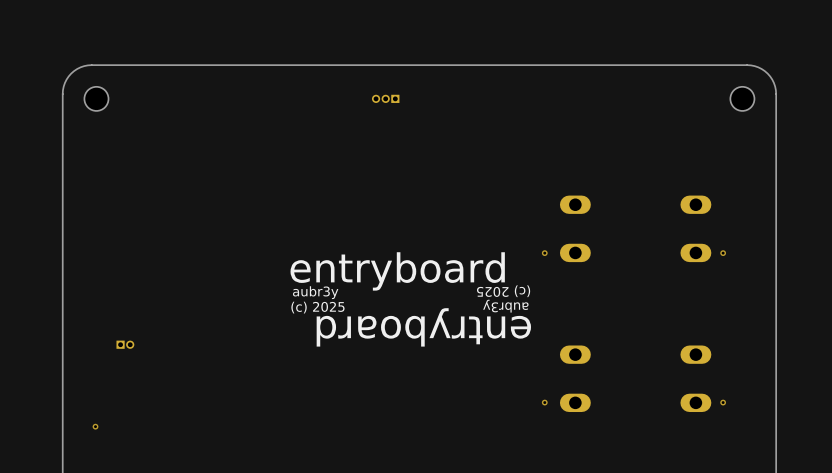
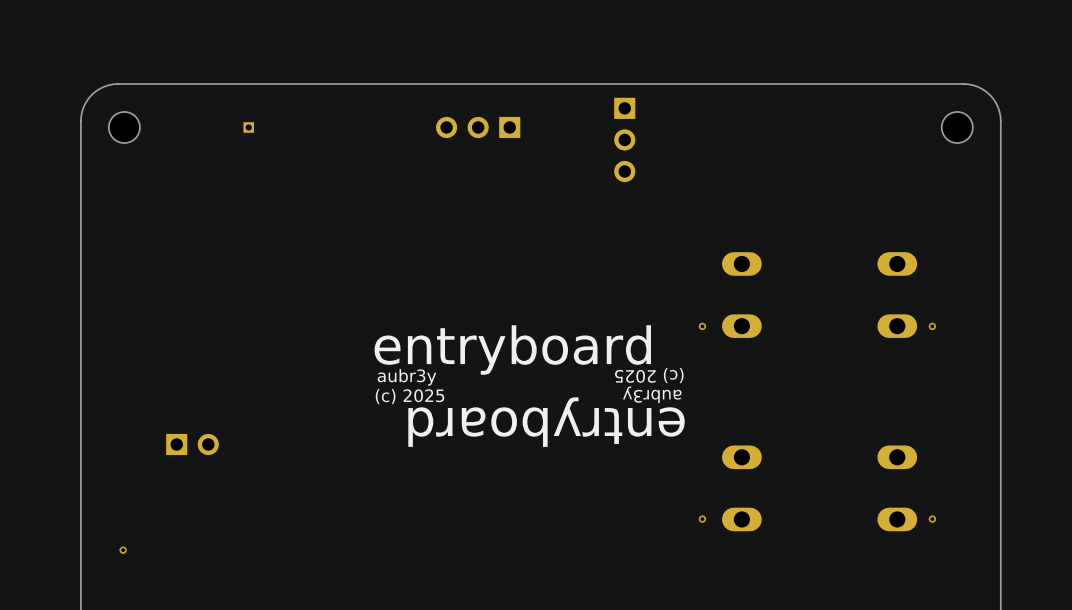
part: none -> (248, 127)
part: none -> (478, 127)
part: (385, 98) -> none
part: none -> (624, 139)
part: (125, 344) -> none
part: none -> (192, 444)

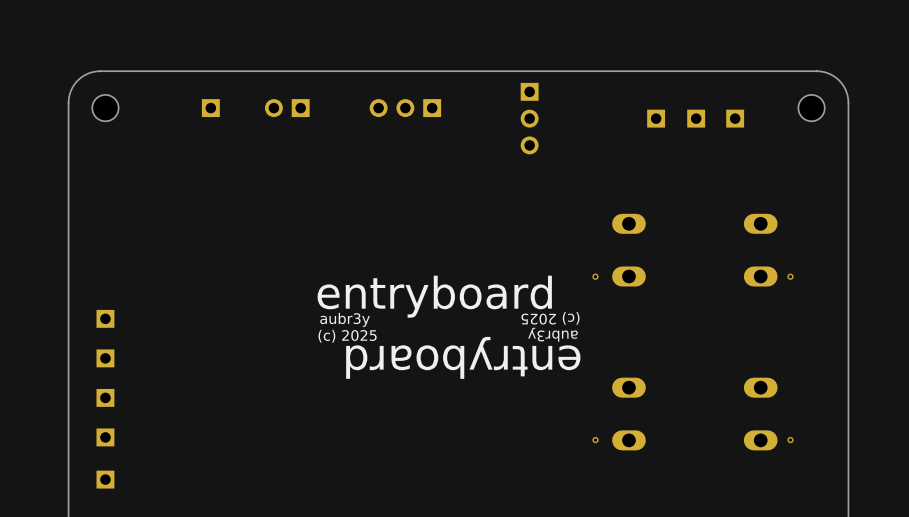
part footprint: [243, 122, 254, 133] -> [201, 99, 220, 118]
part: none -> (287, 108)
part: none -> (656, 118)
part: none -> (696, 118)
part: none -> (735, 118)
part: none -> (105, 318)
part: none -> (105, 358)
part: (192, 444) -> none
part: none -> (105, 397)
part: none -> (105, 437)
via: (123, 550) -> none
part: none -> (105, 479)

